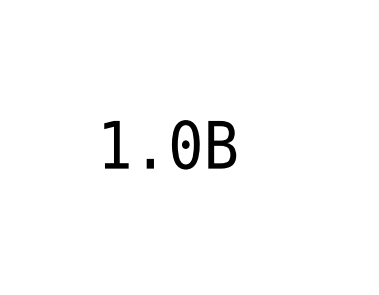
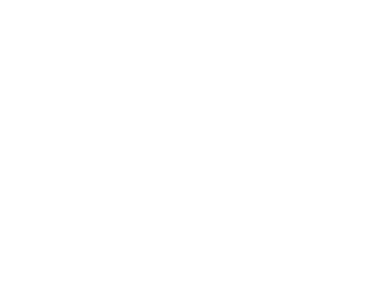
text: 1.0B (170, 144) -> none

